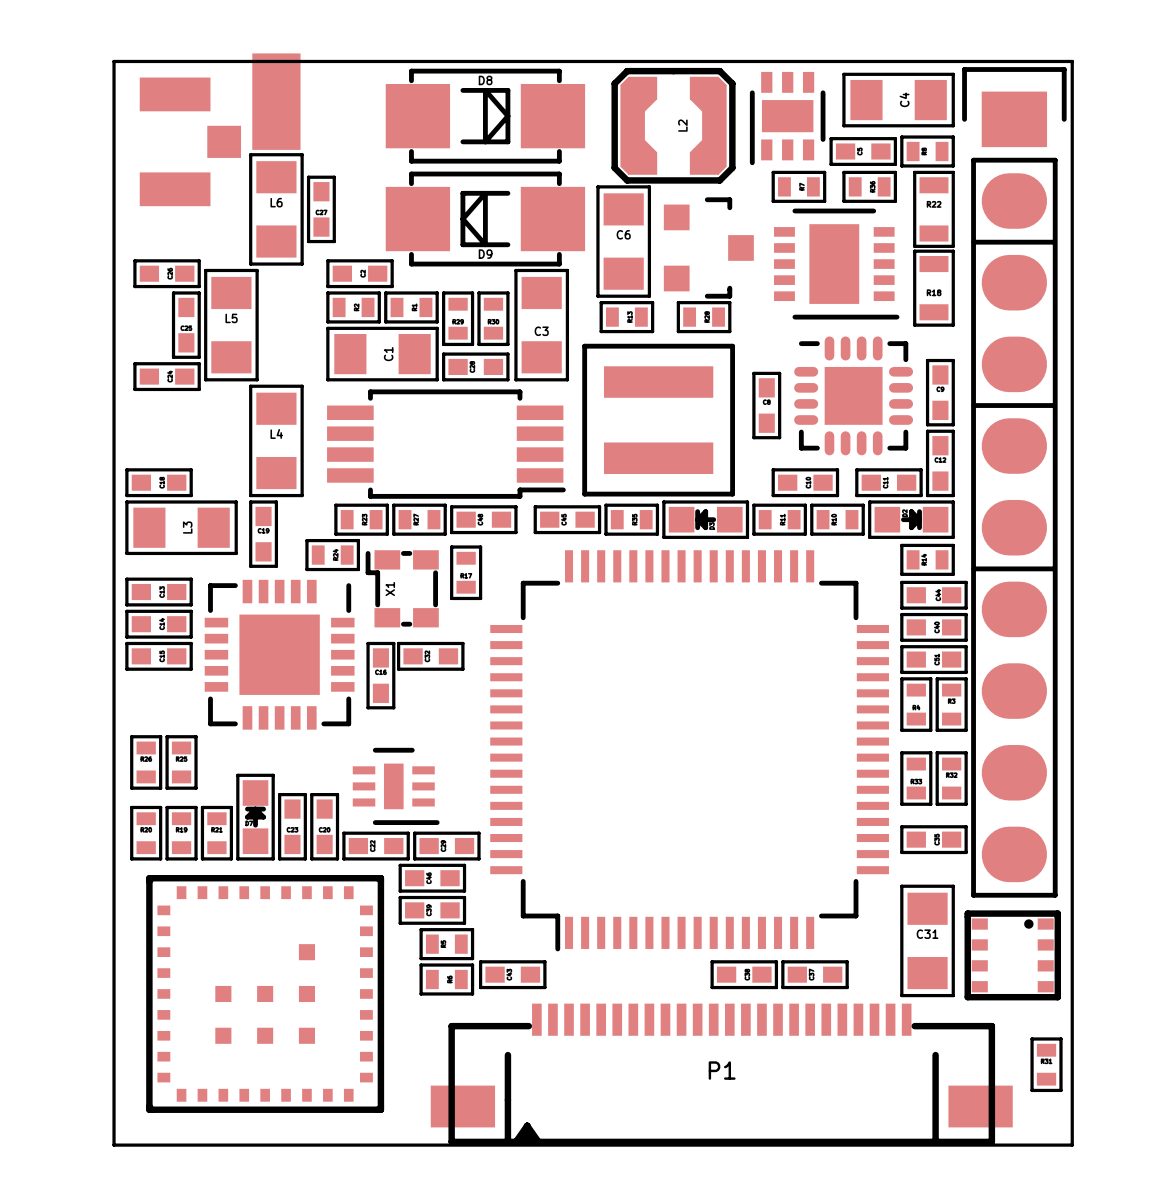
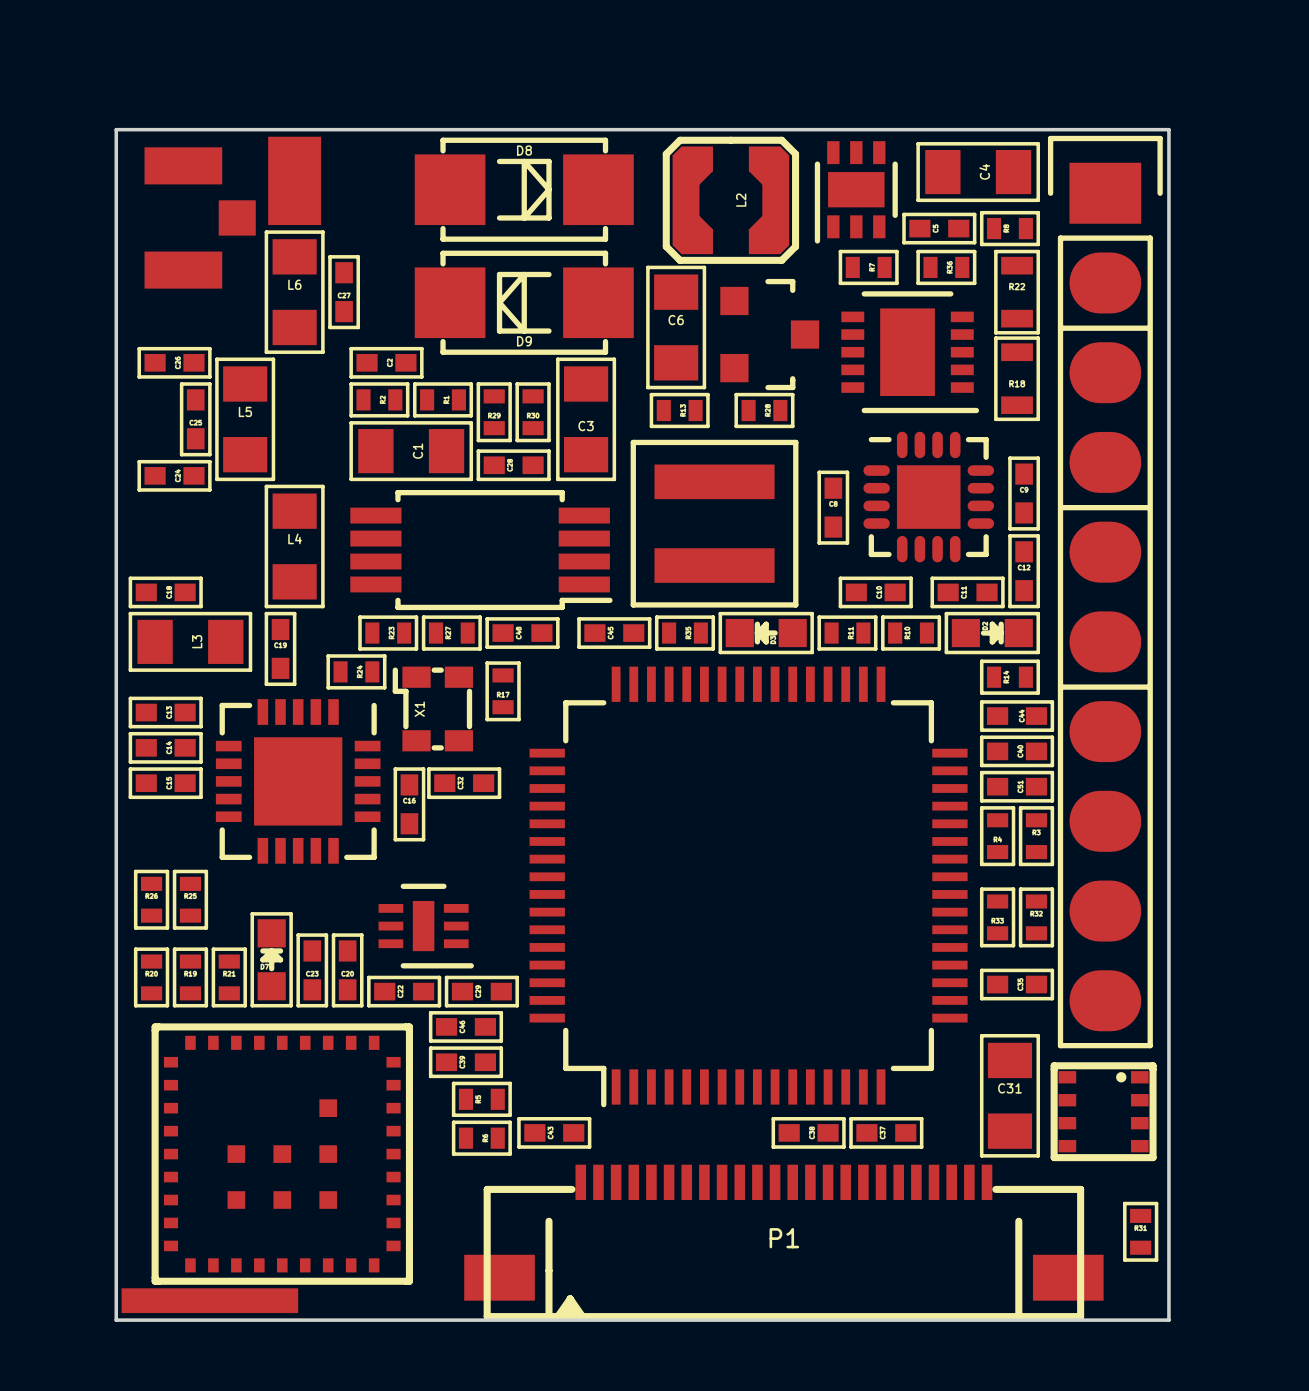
part footprint: [252, 53, 301, 150] -> [268, 136, 322, 226]
part: none -> (209, 1300)

